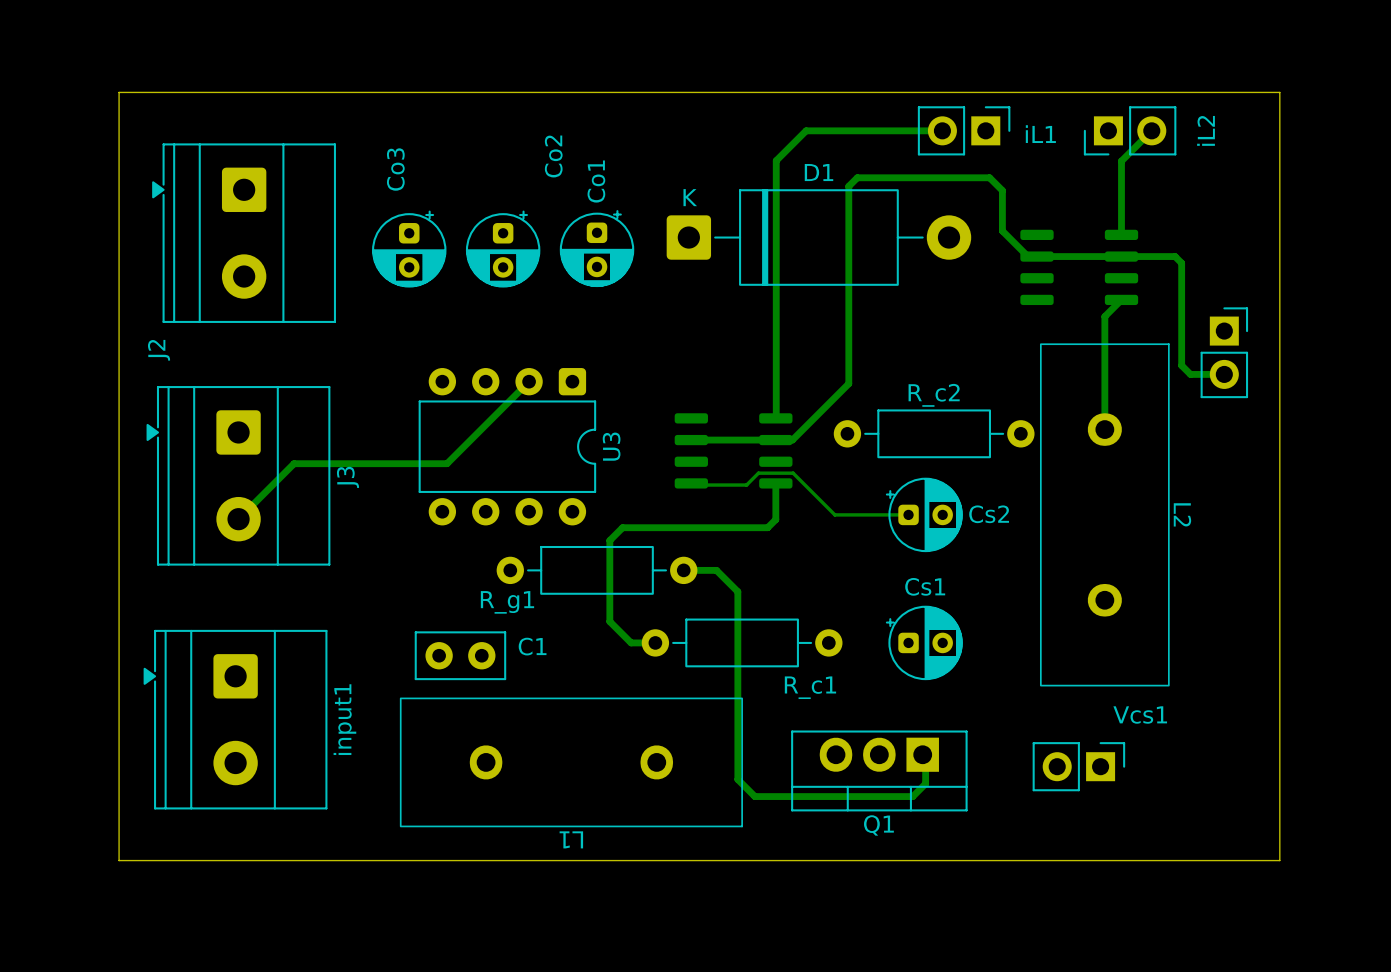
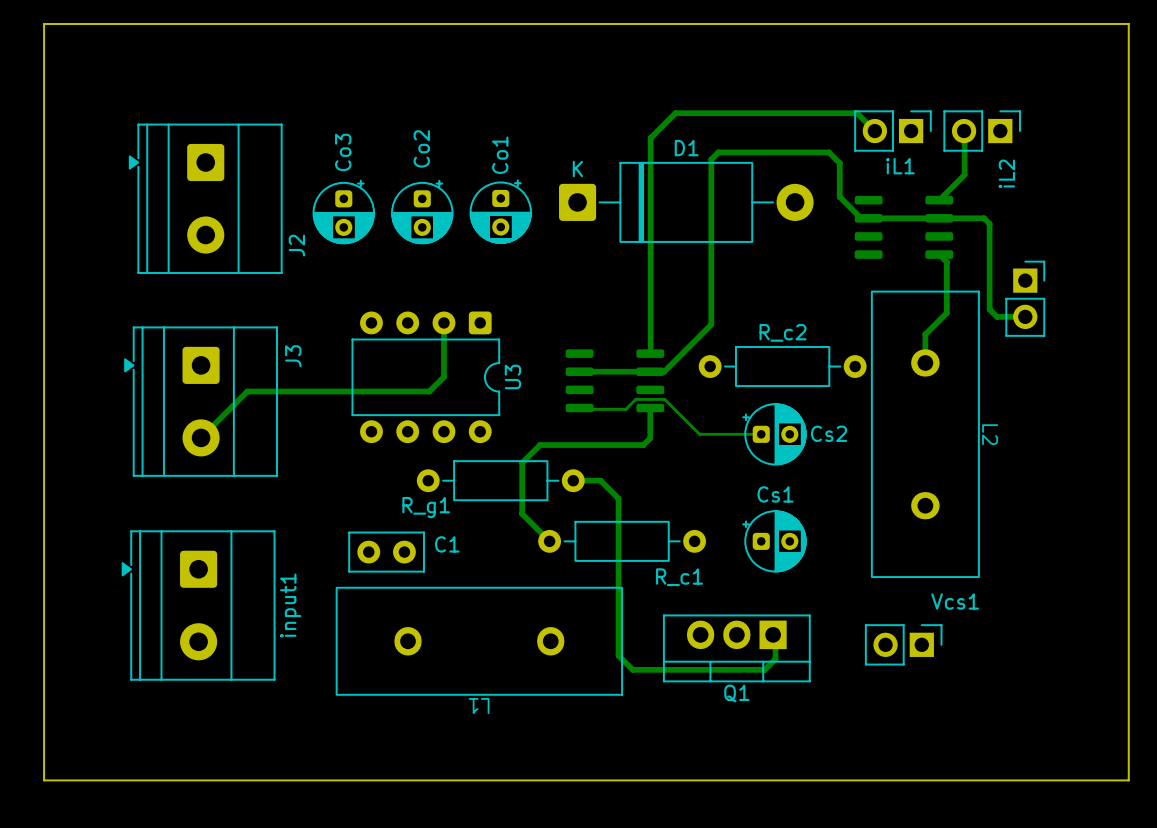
board edge: (119, 92) (1279, 92) (1279, 860) (119, 860) (119, 92) -> (44, 23) (44, 780) (1128, 780) (1128, 23) (44, 23)
bottom track: none -> (789, 113) (857, 113) (874, 131)
iL1 position: (964, 130) -> (892, 131)
iL2 rotation: 0° (1130, 130) -> 180° (982, 131)
bottom track: (1151, 130) (1121, 161) (1121, 234) -> (964, 131) (964, 174) (939, 200)
iL2 name position: iL2 (1206, 130) -> iL2 (1006, 173)
iL1 name position: iL1 (1040, 134) -> iL1 (900, 166)
Co2 name position: Co2 (553, 156) -> Co2 (421, 148)
Co3 name position: Co3 (395, 169) -> Co3 (343, 152)
bottom track: (1121, 299) (1104, 316) (1104, 395) -> (939, 254) (946, 262) (946, 313) (925, 334)
J2 name position: J2 (159, 350) -> J2 (296, 245)
bottom track: (529, 381) (447, 463) -> (443, 322) (443, 376) (429, 391) (375, 391)
J3 name position: J3 (347, 477) -> J3 (293, 356)
bottom track: (643, 527) (622, 527) (609, 540) (609, 621) (631, 642) (655, 642) -> (540, 445) (522, 462) (522, 513) (549, 541)

